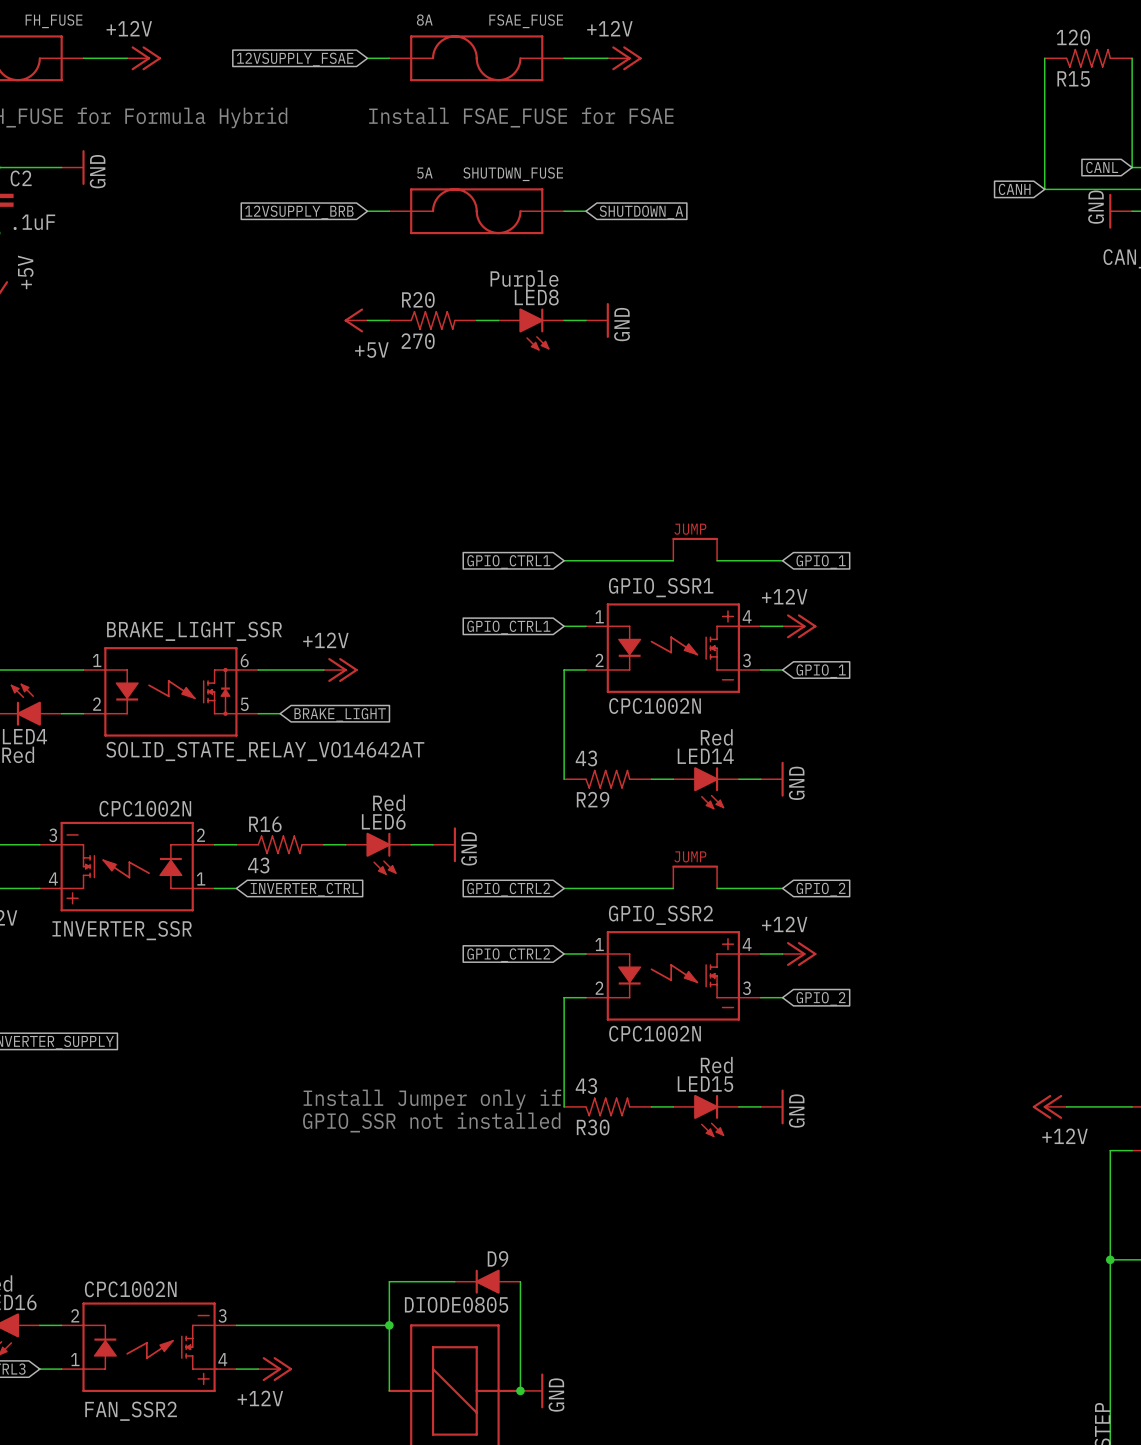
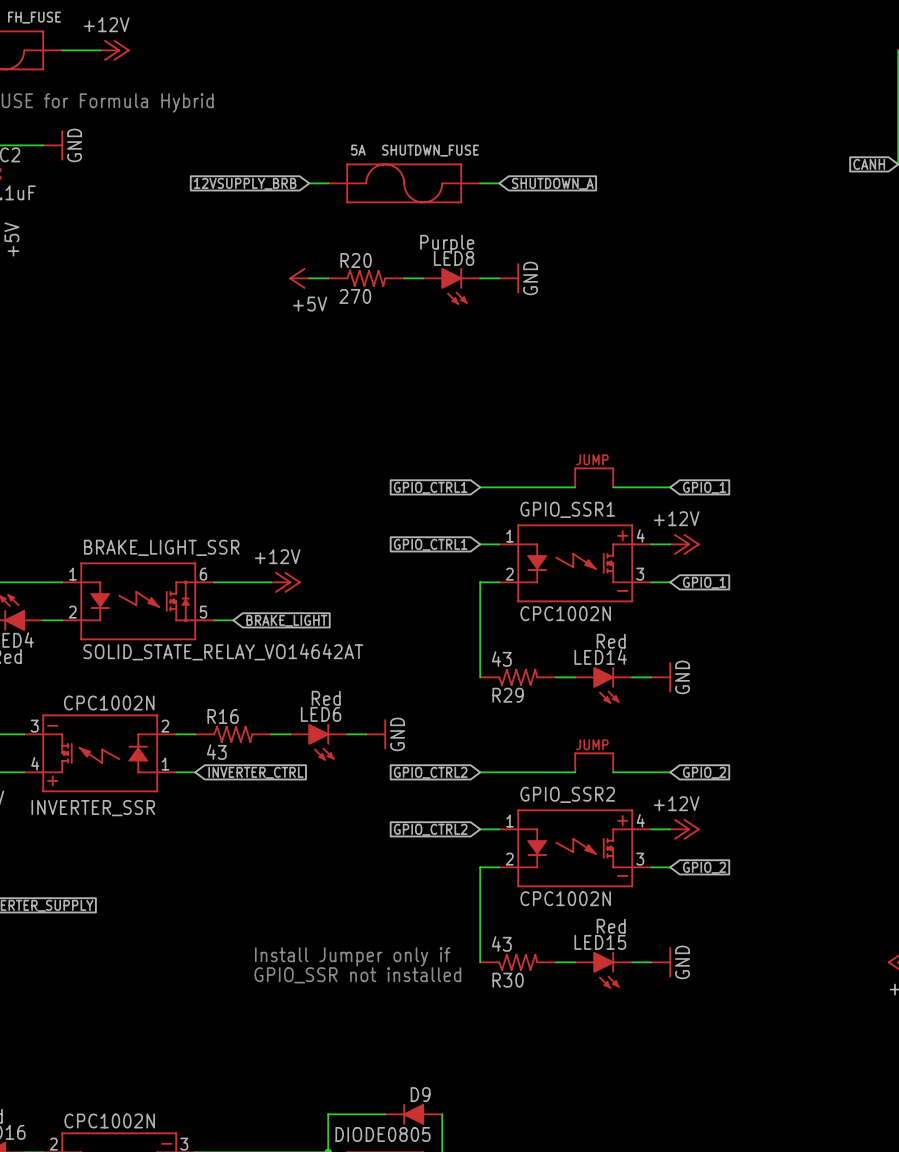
wire: (367, 58) (389, 58) -> none
FSAE_FUSE: 8A (476, 58) -> none
wire: (564, 58) (607, 58) -> none
power symbol: +12V (624, 58) -> none
global label: 12VSUPPLY_FSAE (295, 59) -> none
text: Install FSAE_FUSE for FSAE (521, 117) -> none

